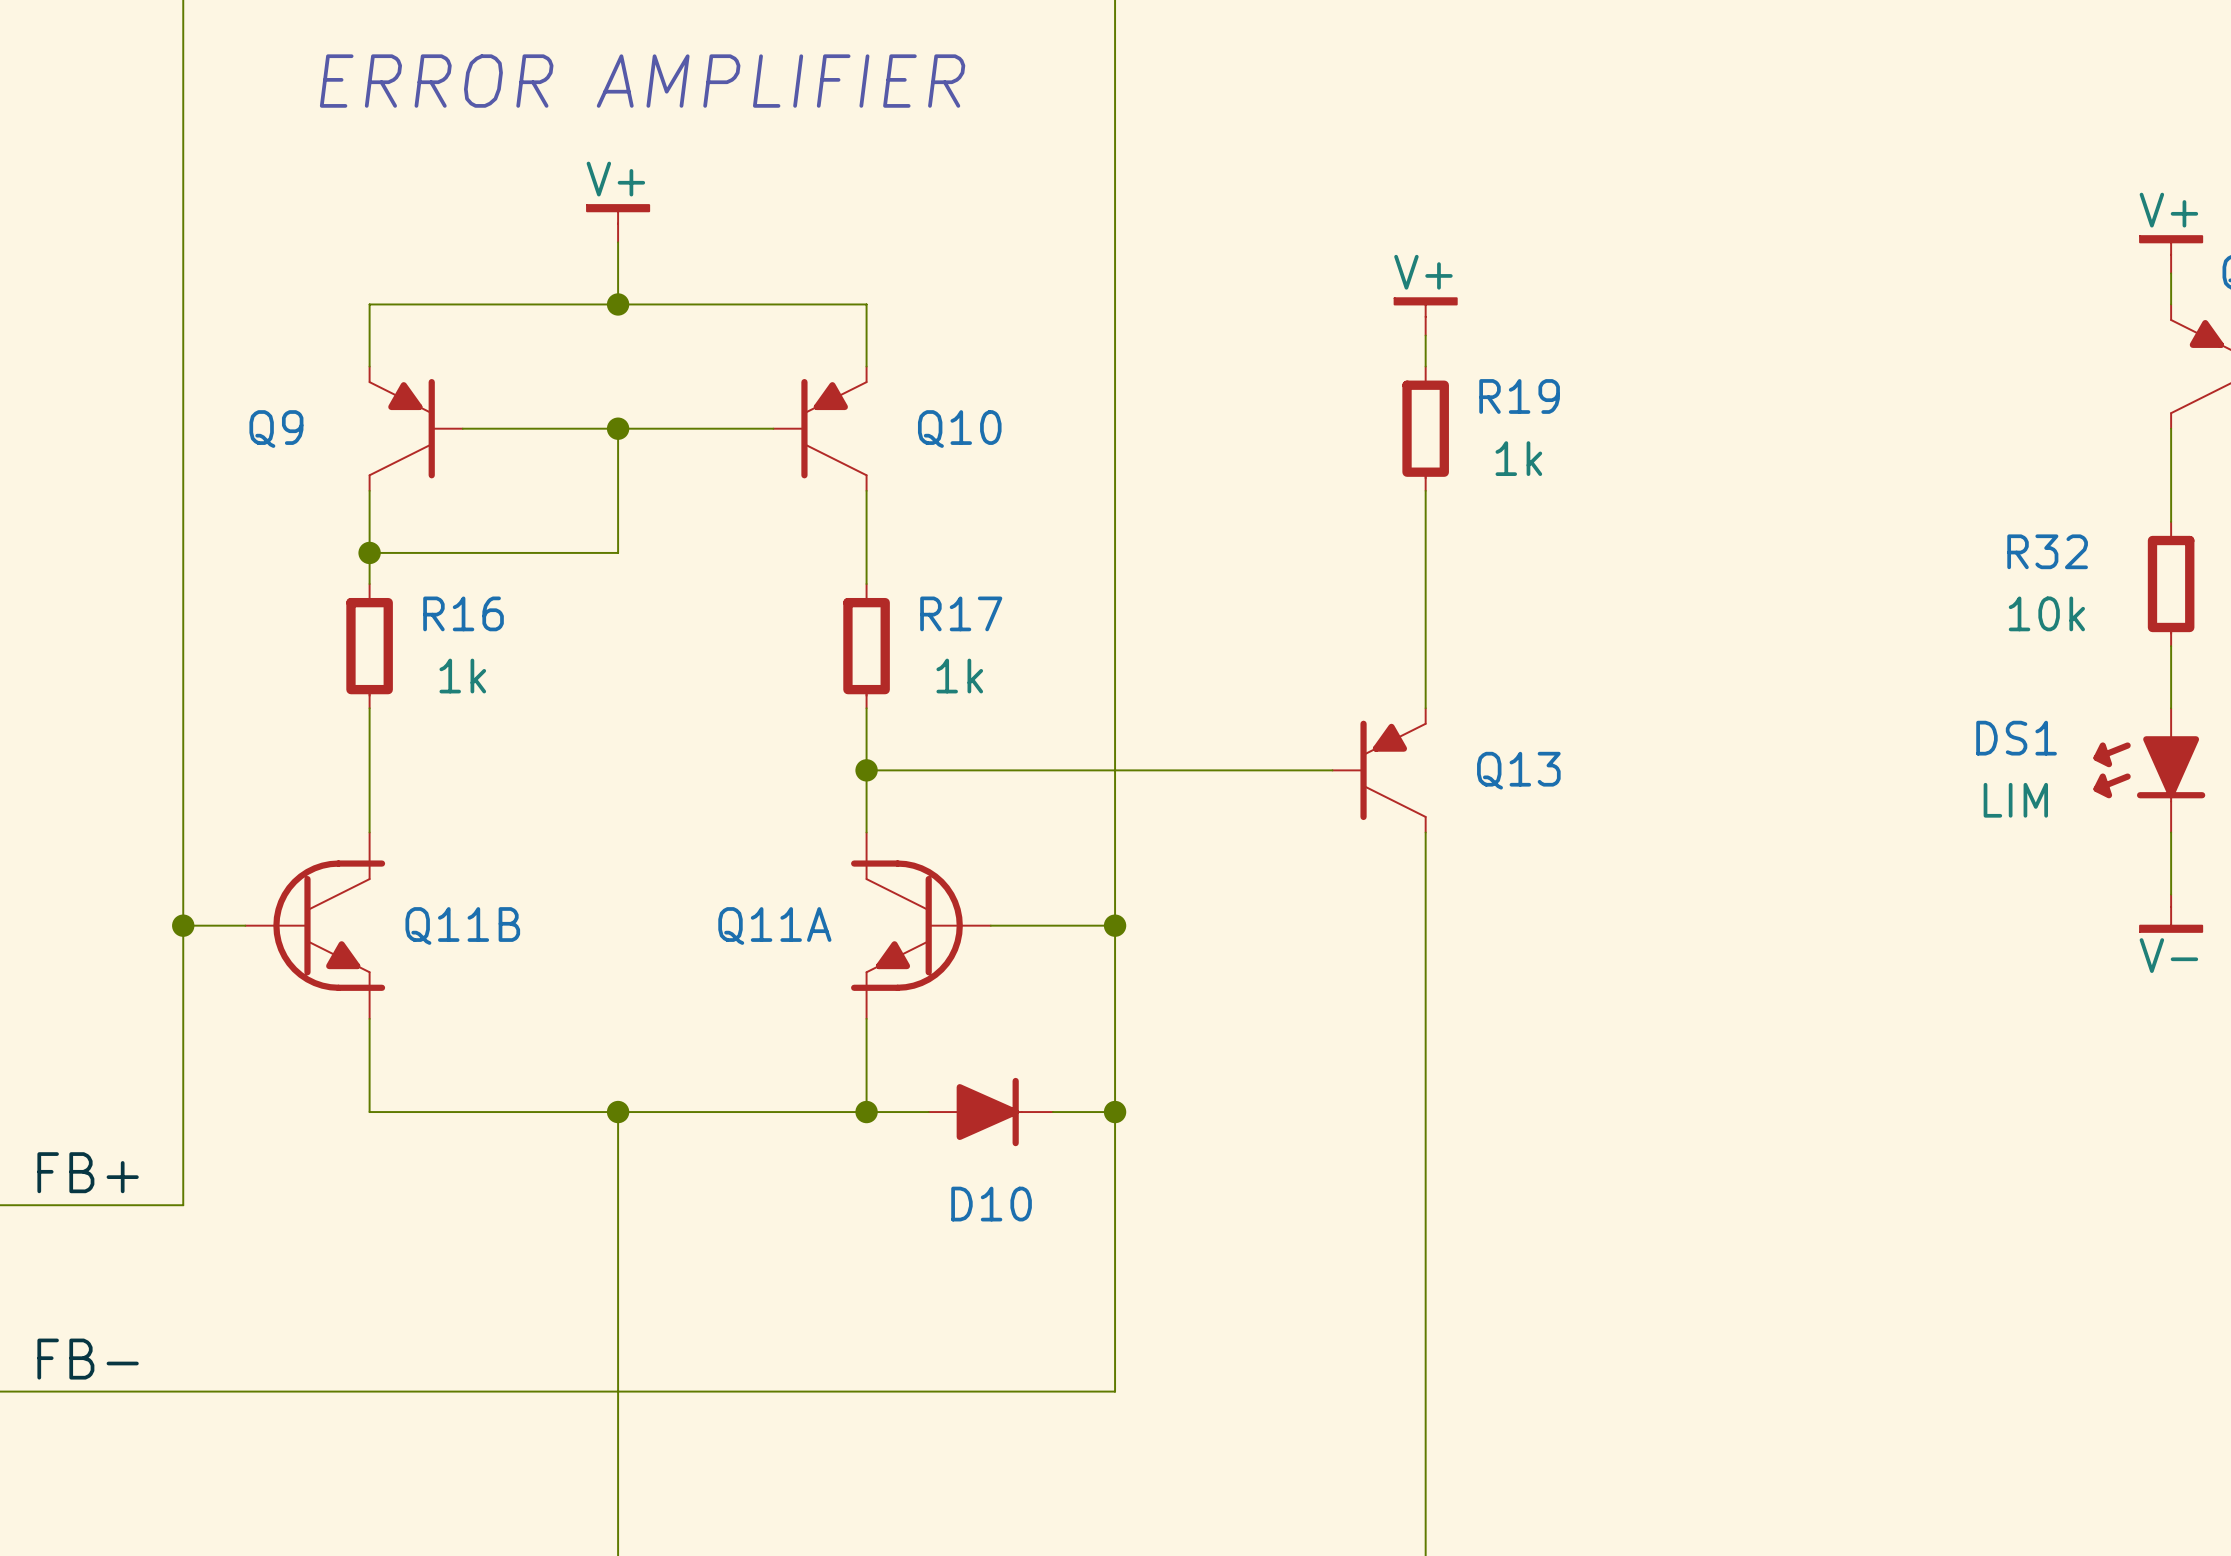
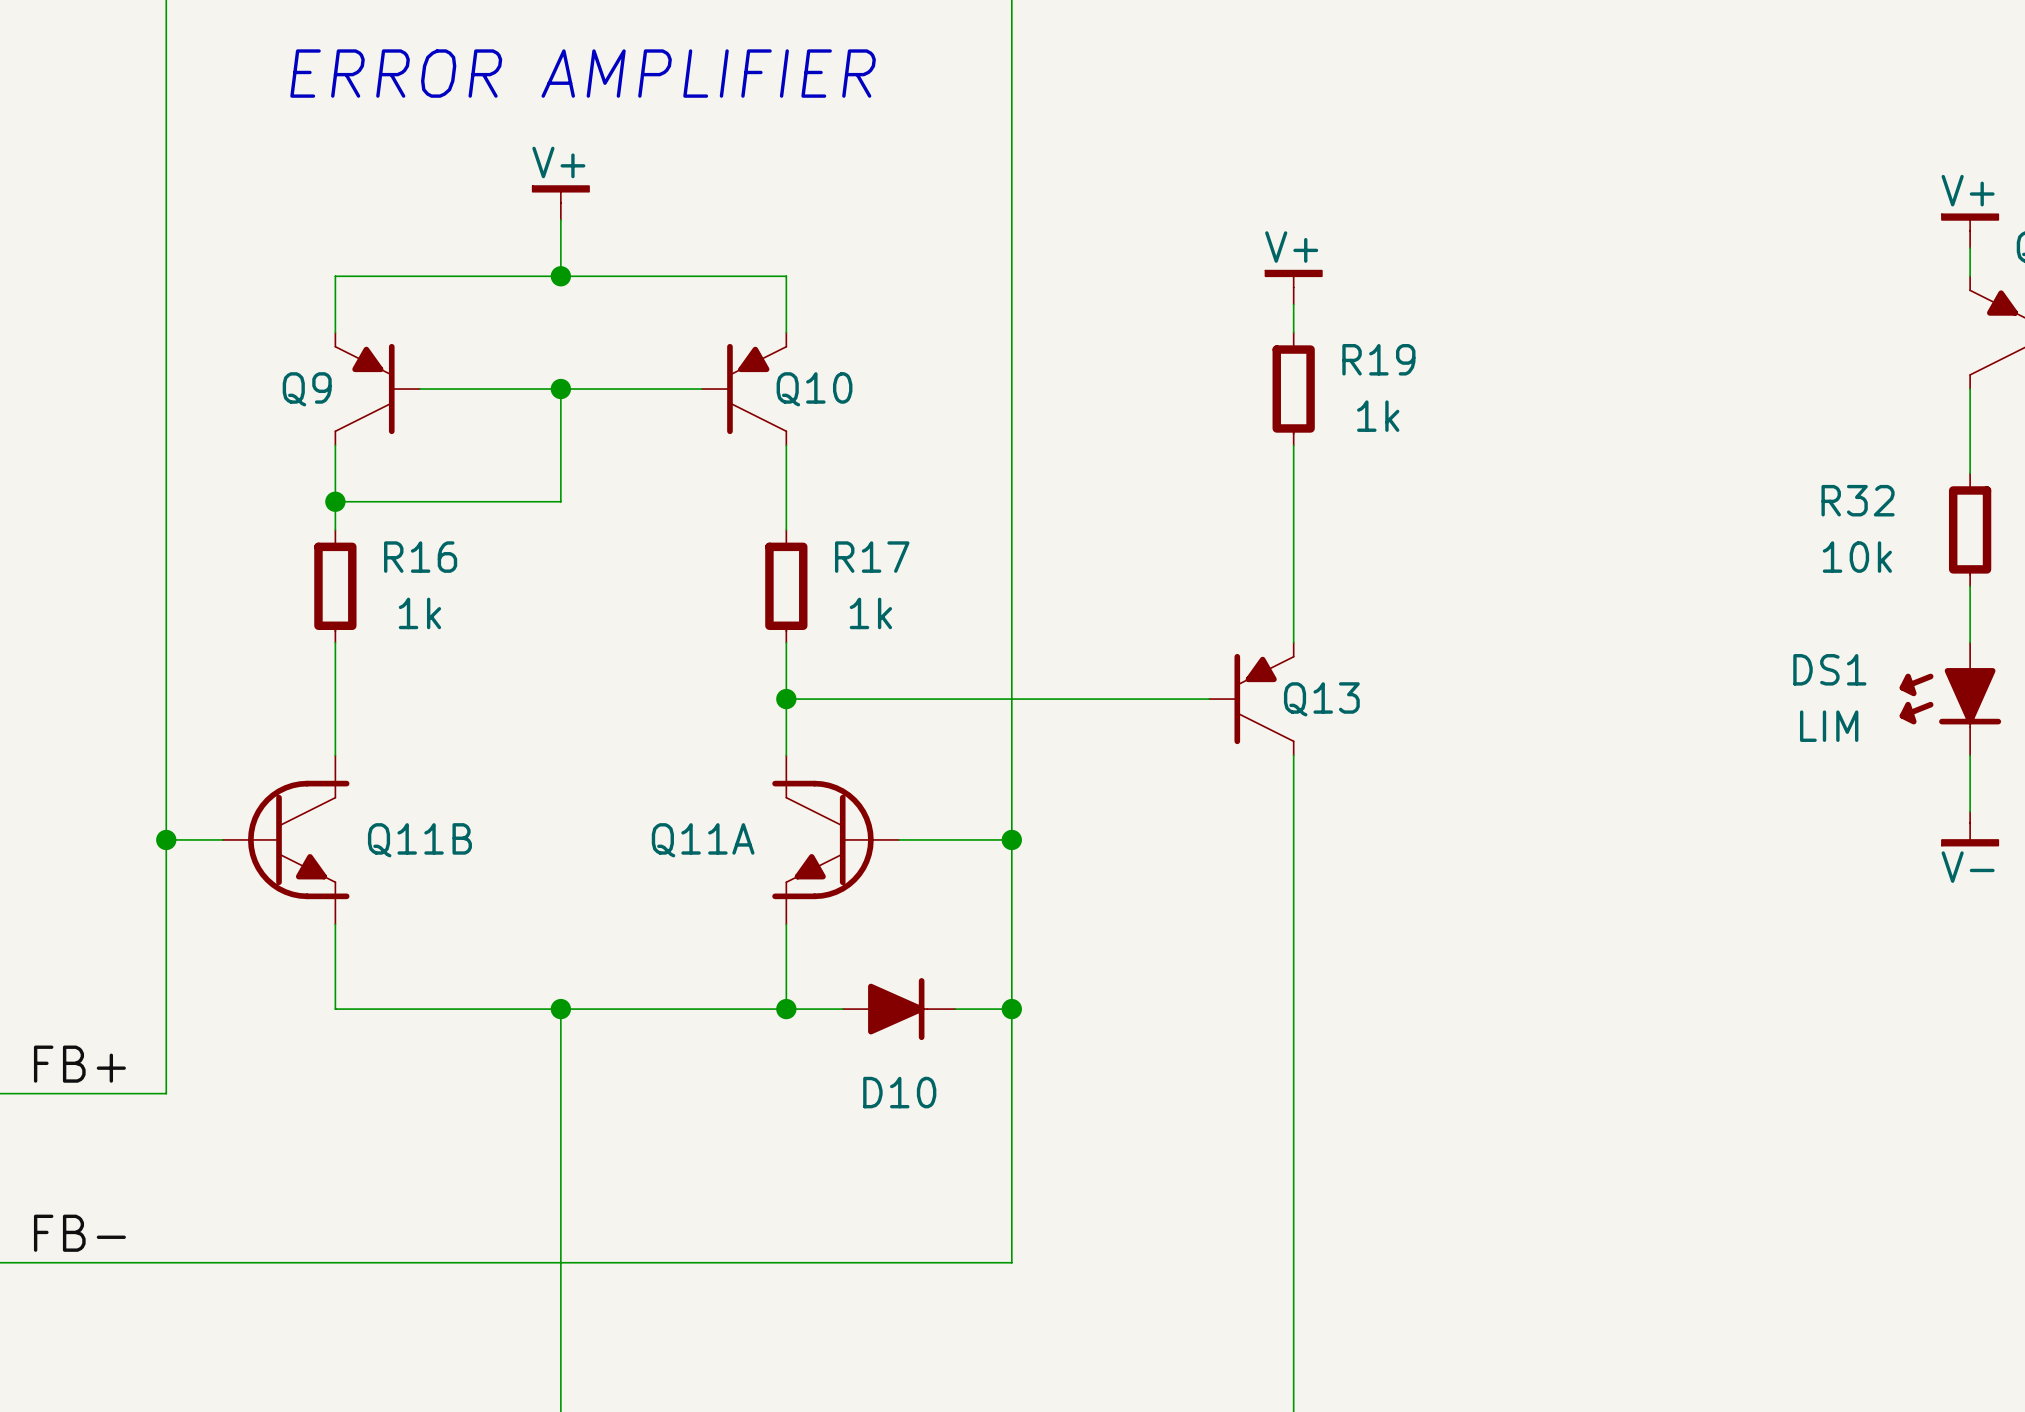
Q9 name position: Q9 (276, 429) -> Q9 (307, 389)
Q10 name position: Q10 (959, 429) -> Q10 (814, 389)
Q13 name position: Q13 (1518, 770) -> Q13 (1321, 699)

